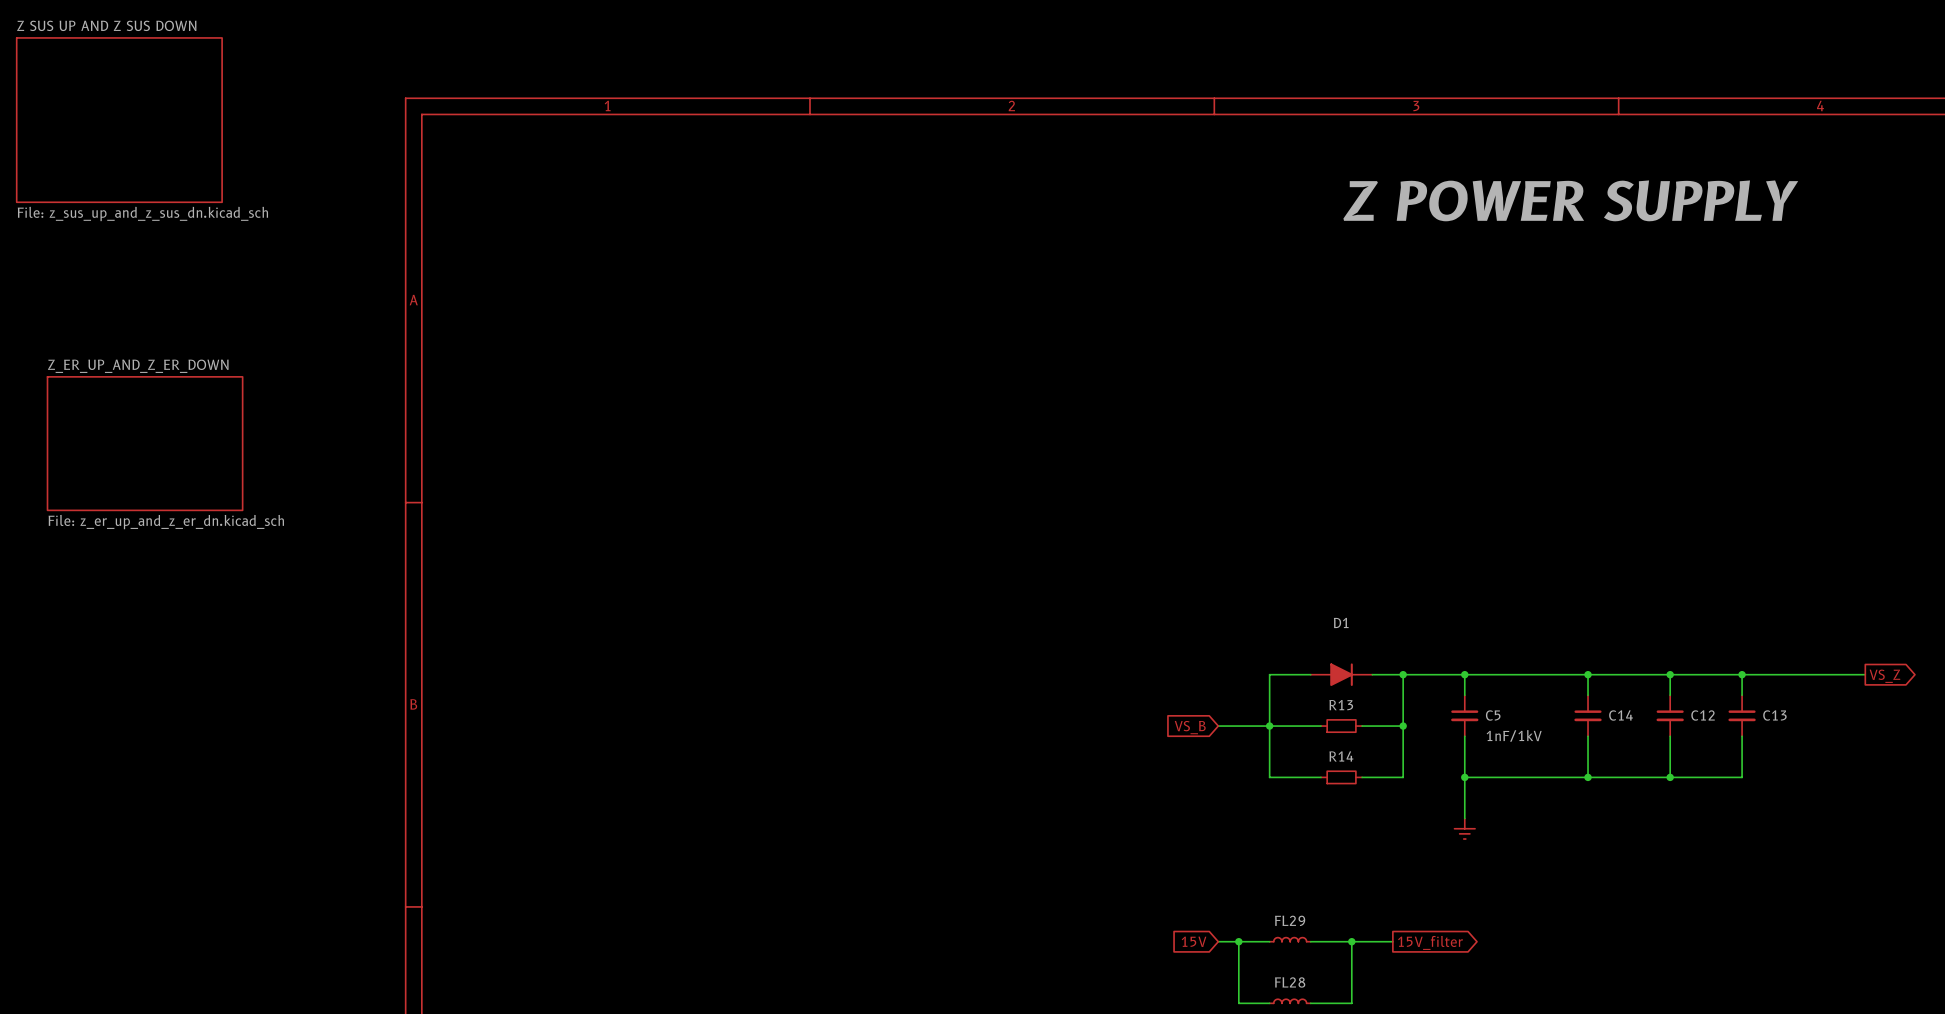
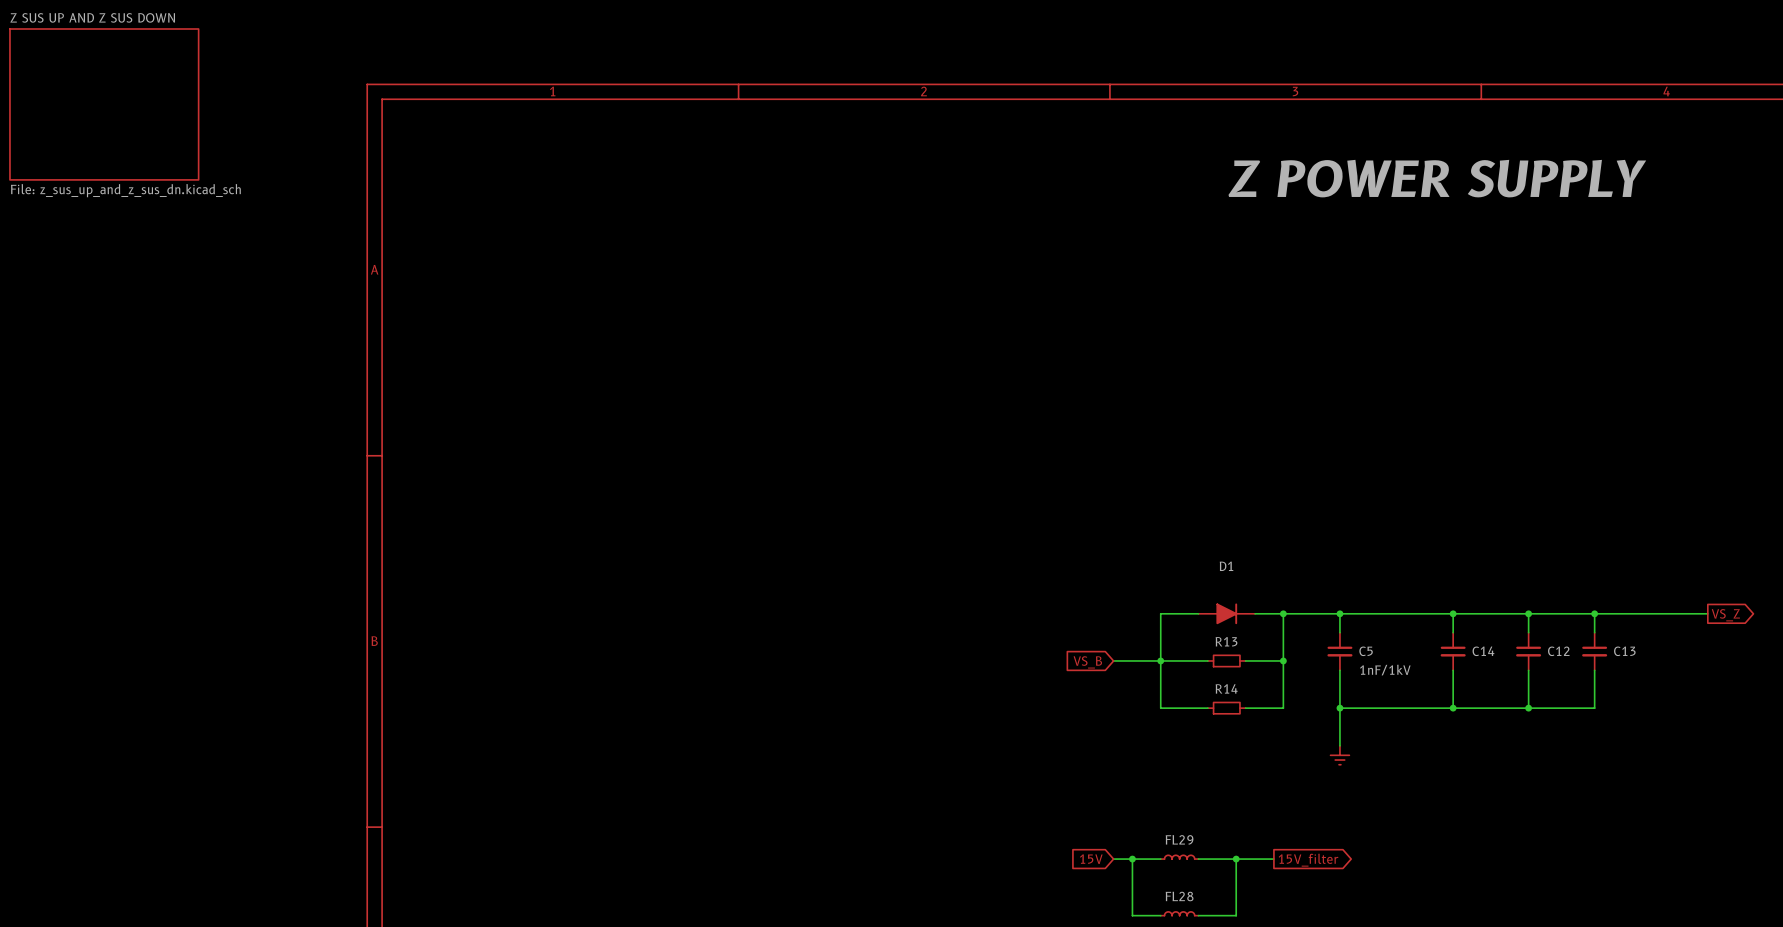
sheet Z_ER_UP_AND_Z_ER_DOWN: File: z_er_up_and_z_er_dn.kicad_sch (145, 443) -> none

